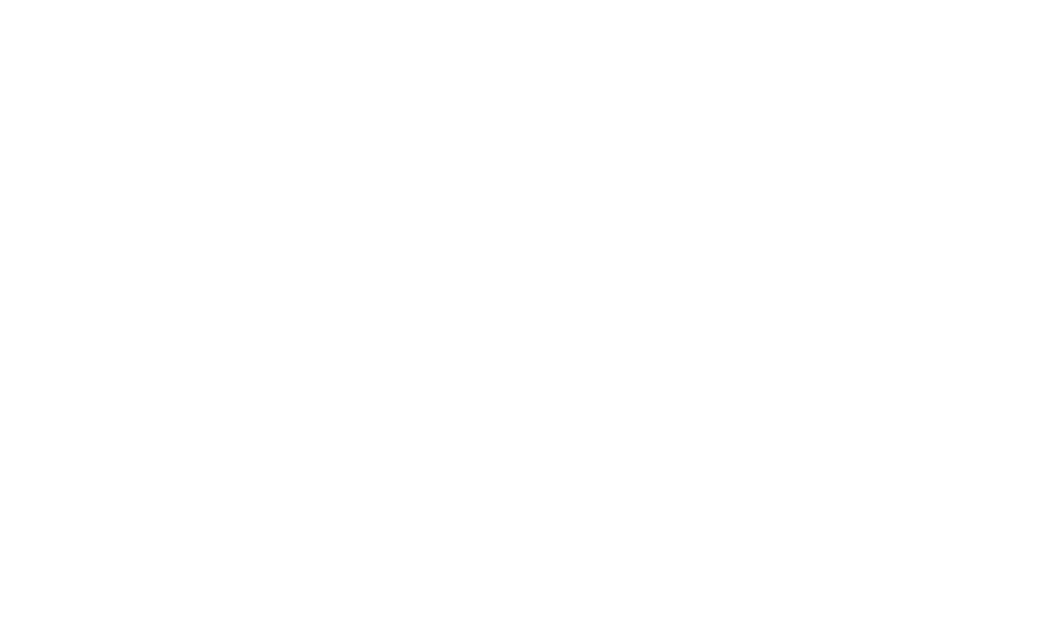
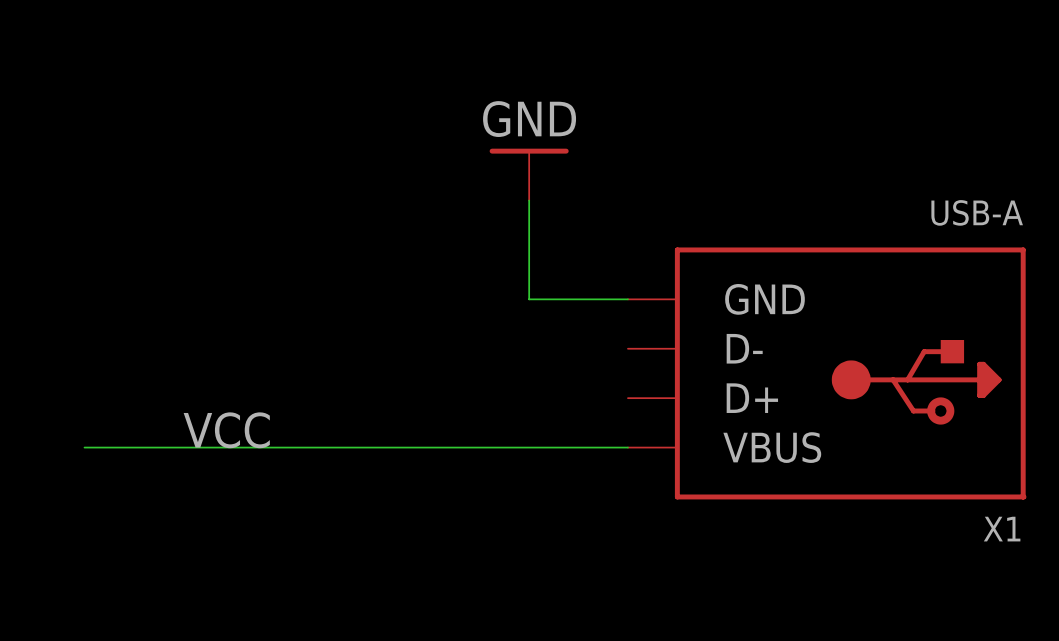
power symbol: none -> GND (529, 174)
wire: none -> (529, 200) (529, 299) (627, 299)
X1: none -> USB-A (827, 373)
label: none -> VCC (226, 430)
wire: none -> (84, 447) (627, 447)

